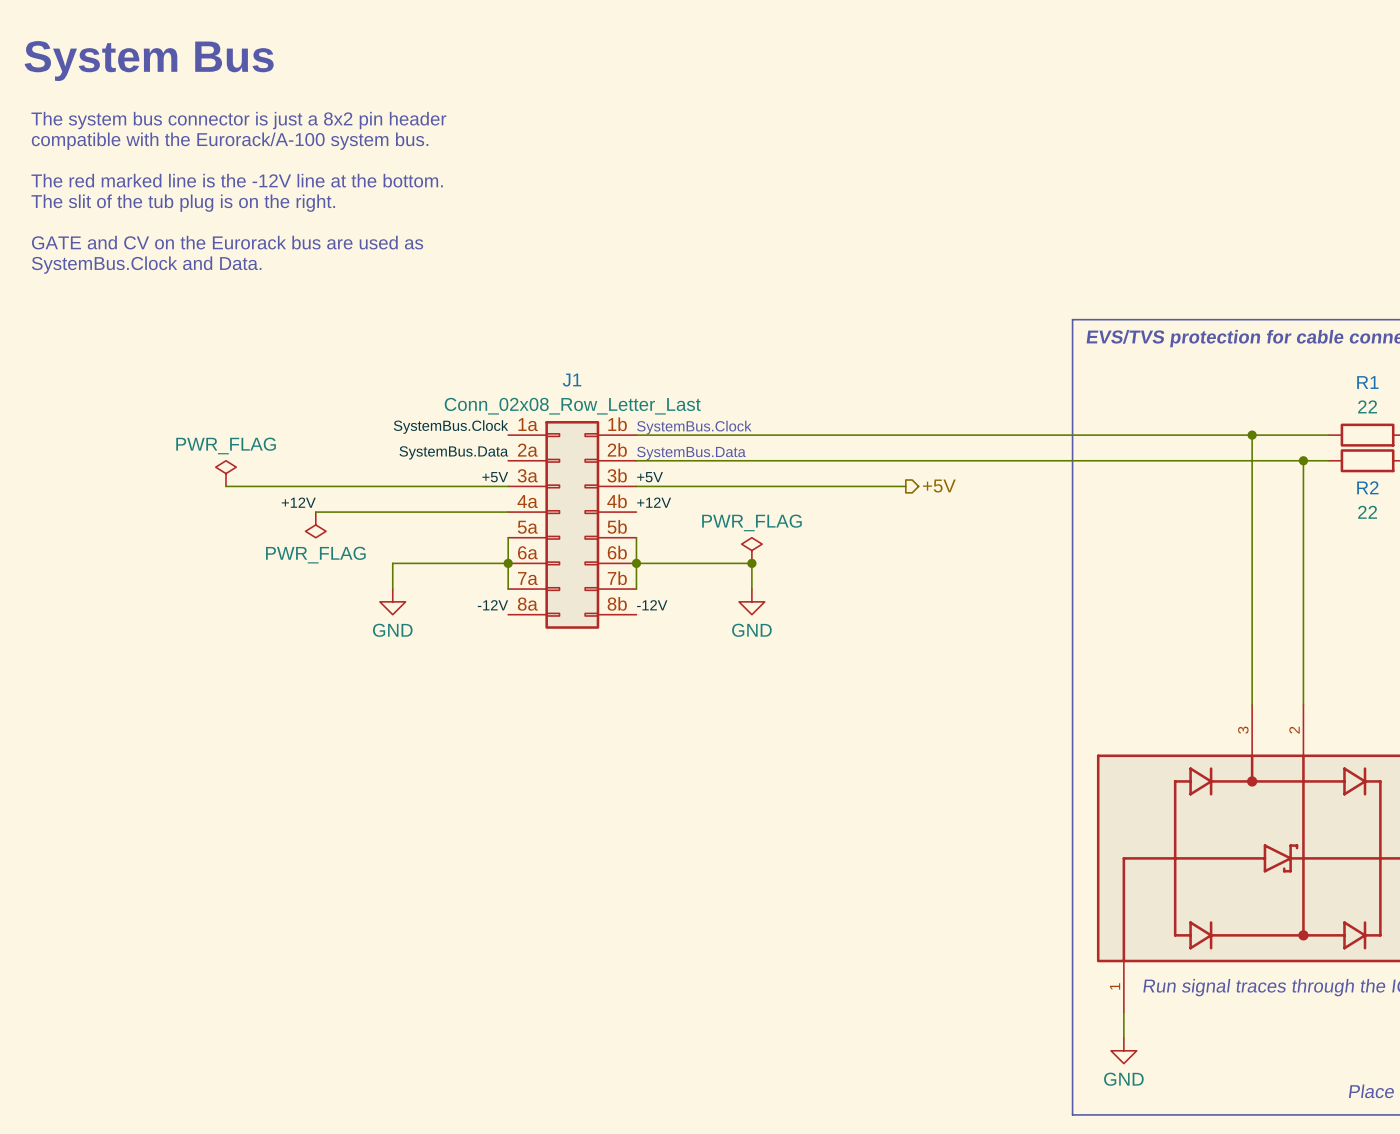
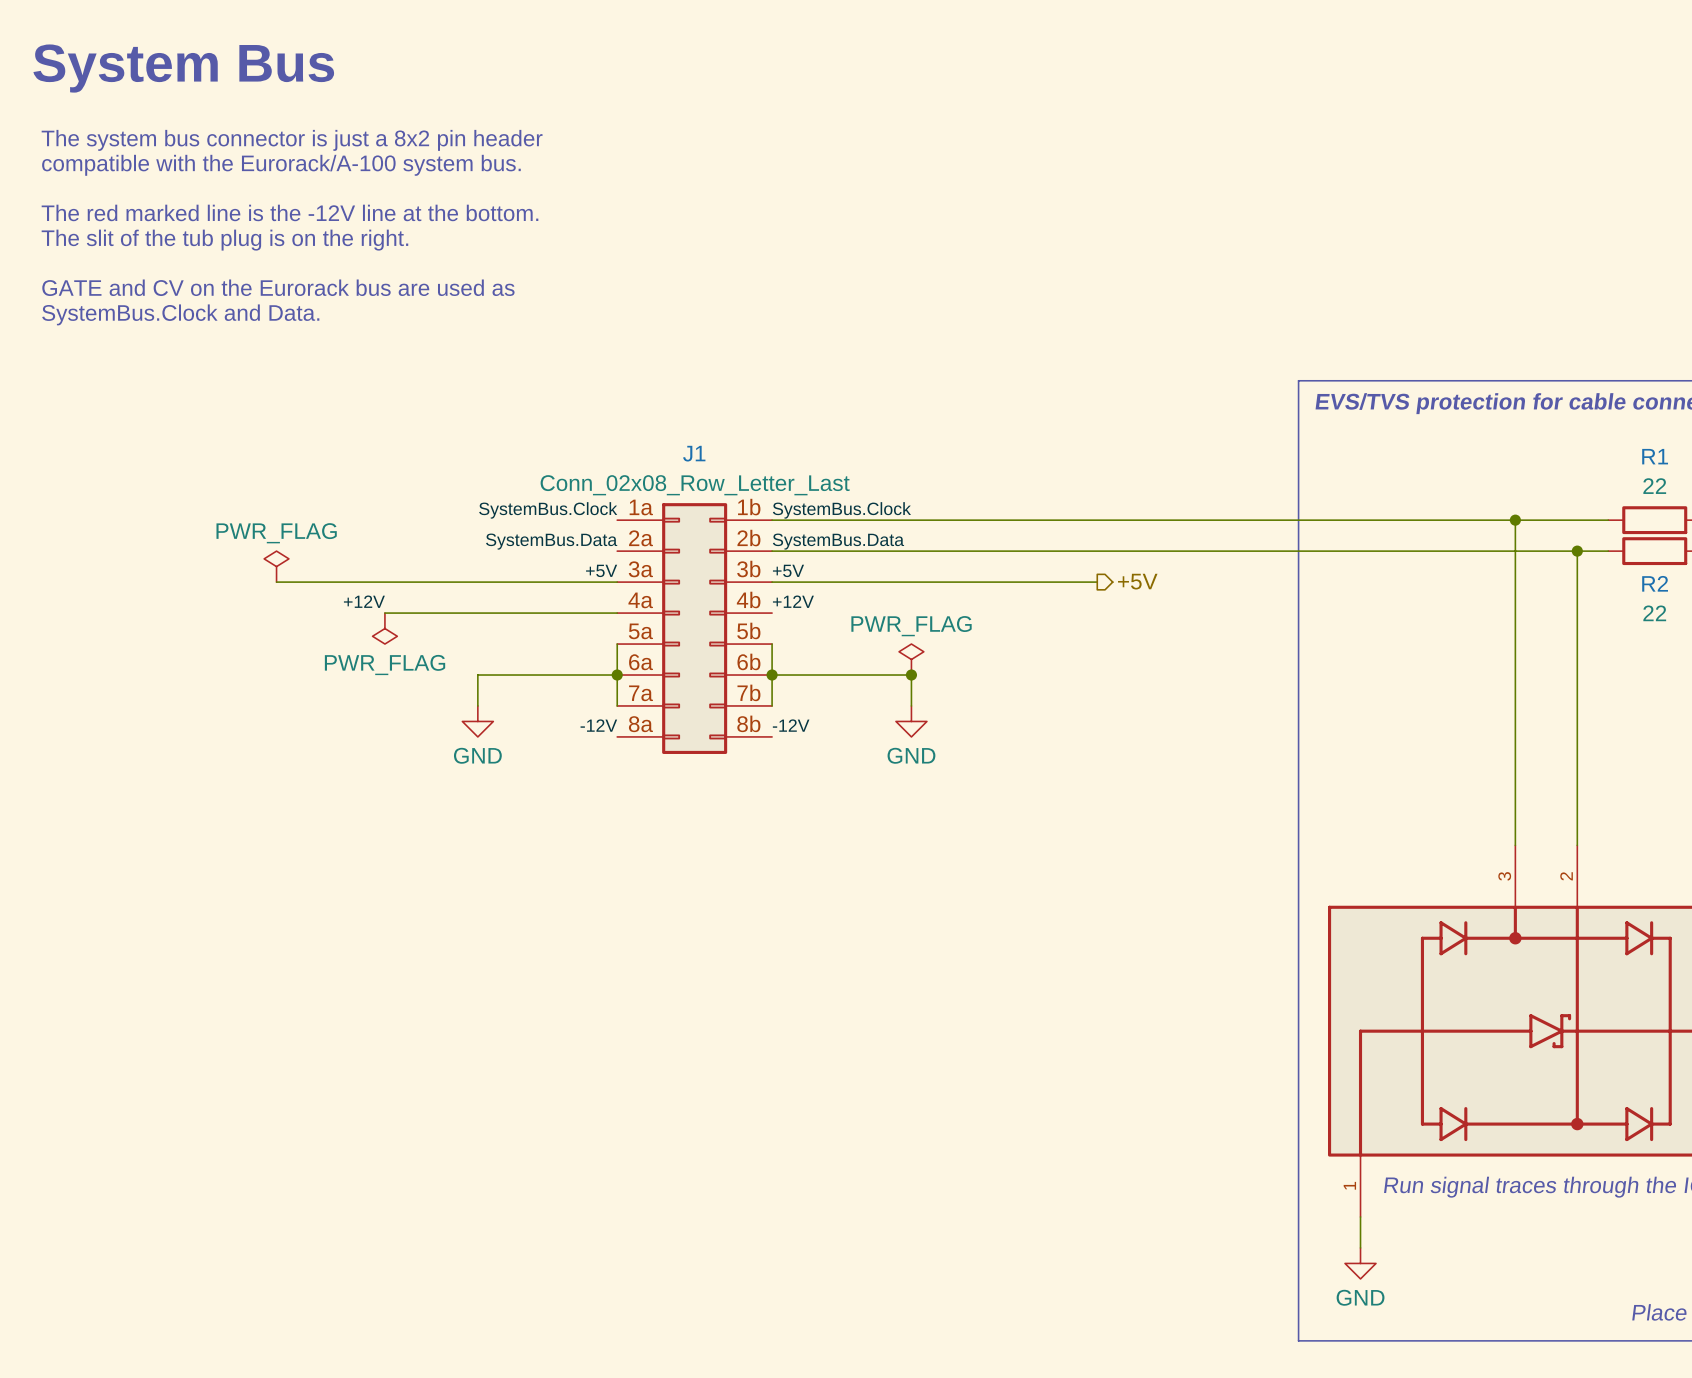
text: SystemBus.Clock (694, 427) -> none
label: none -> SystemBus.Clock (841, 510)
label: none -> SystemBus.Data (838, 541)
text: SystemBus.Data (691, 453) -> none

